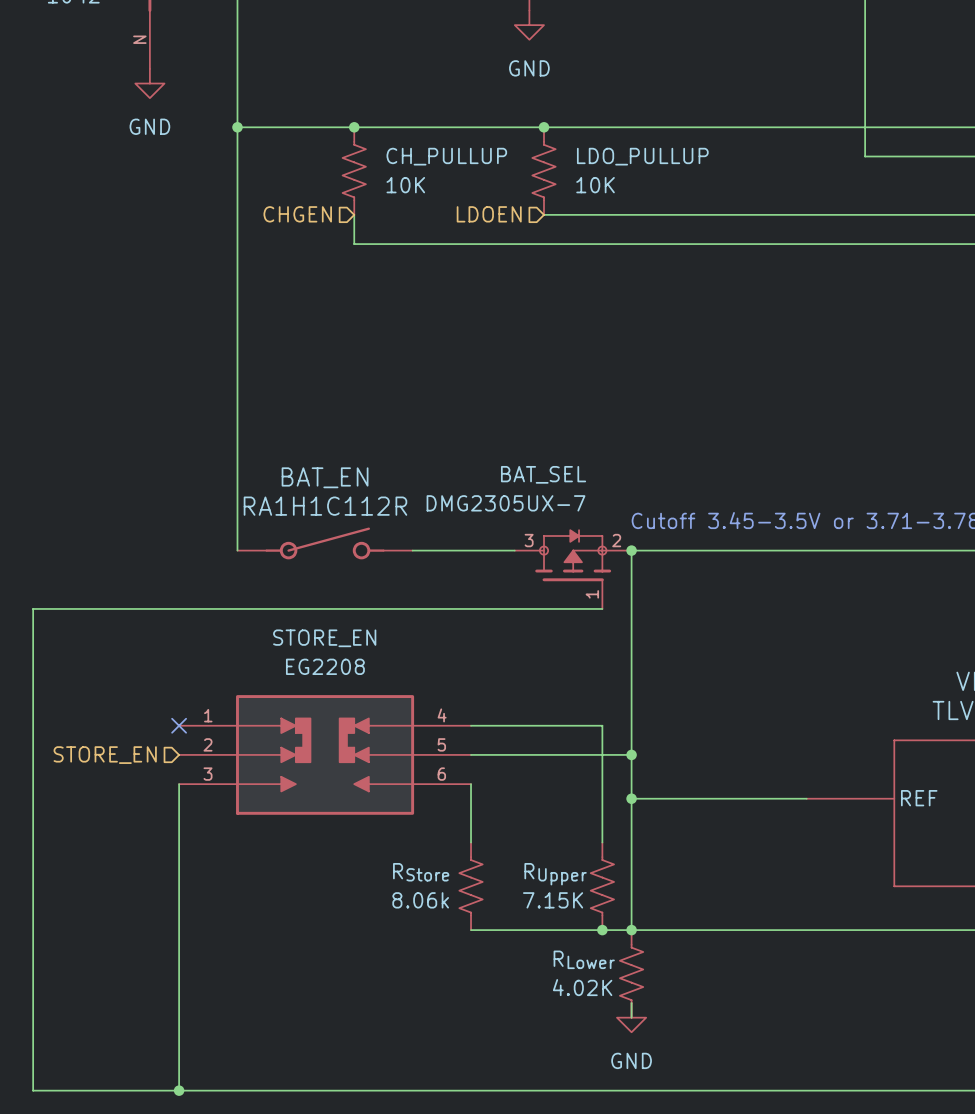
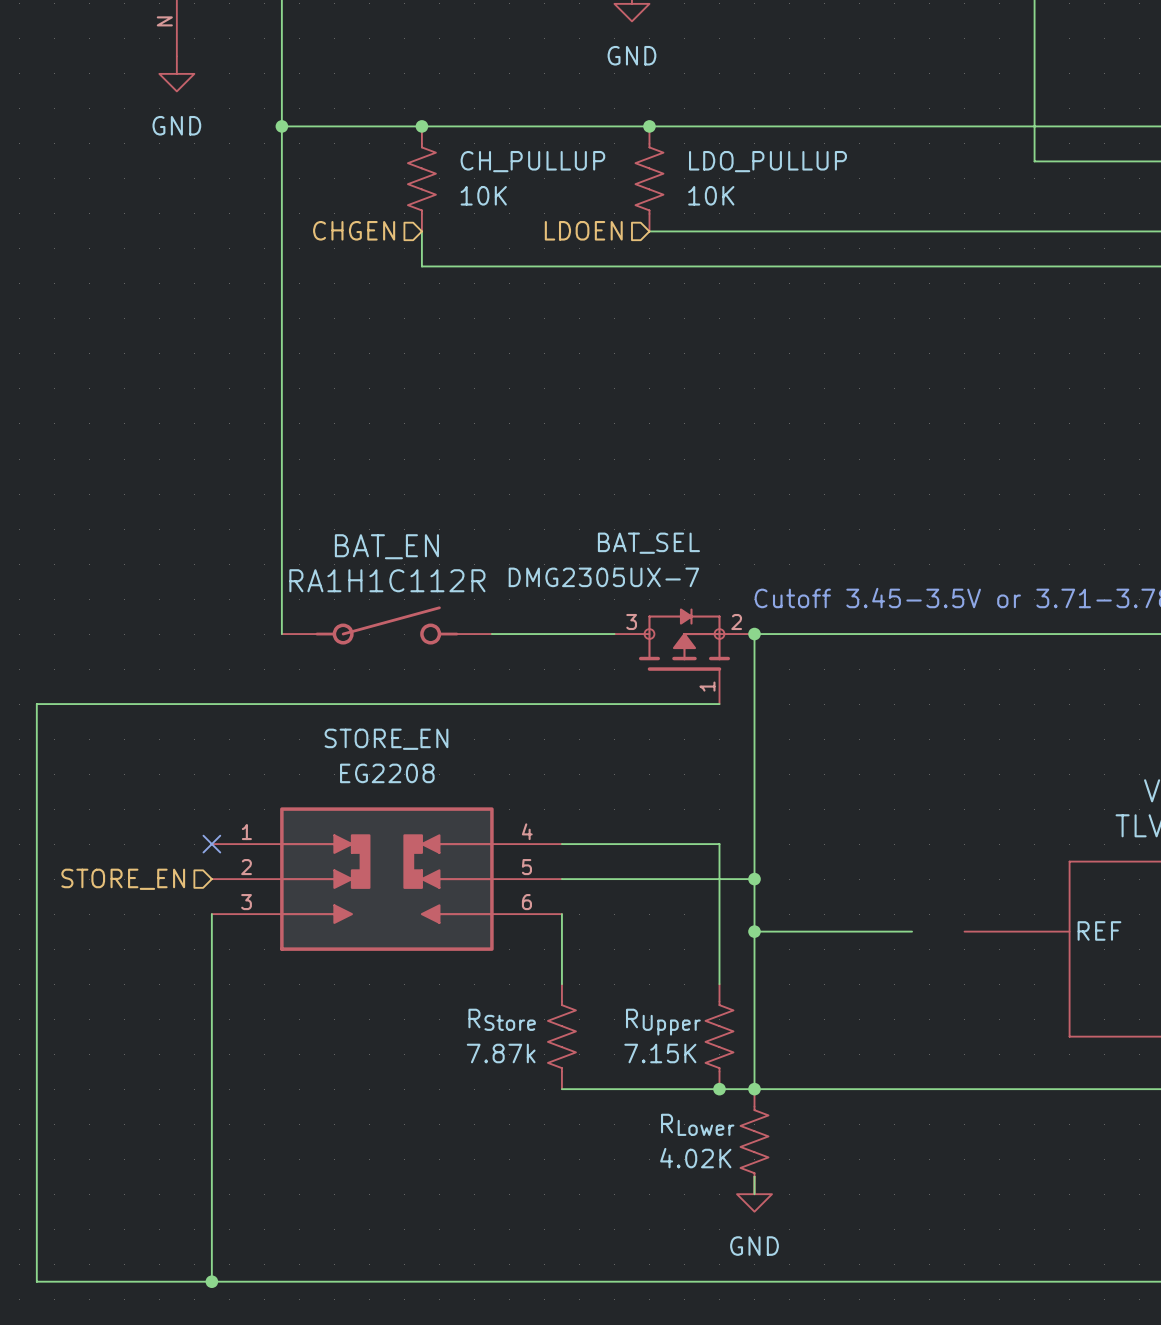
wire: (762, 798) (806, 798) -> none
RStore value: 8.06k (420, 900) -> 7.87k (501, 1053)

